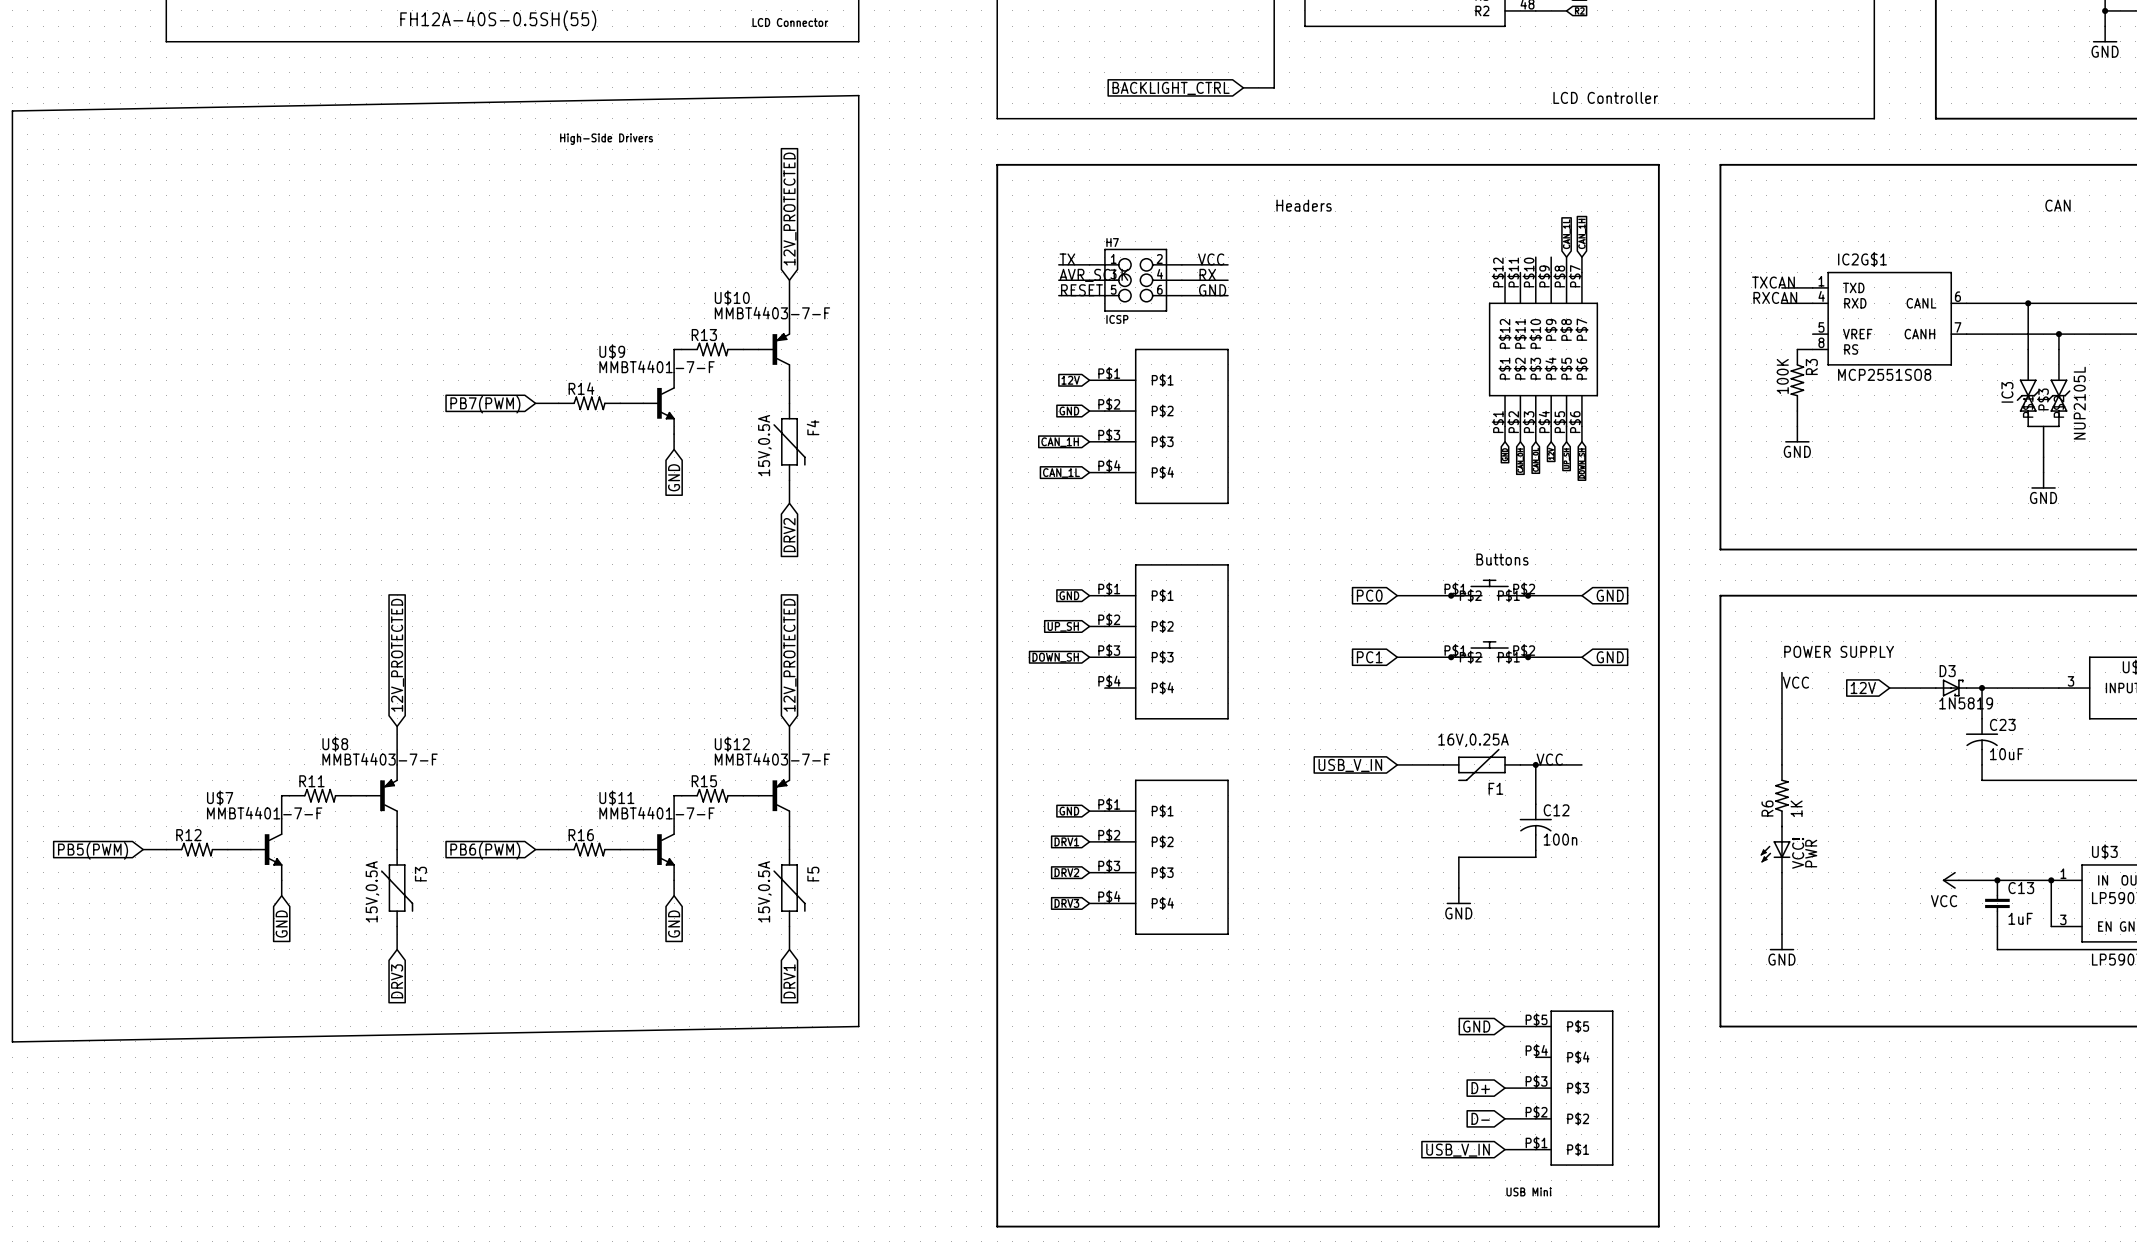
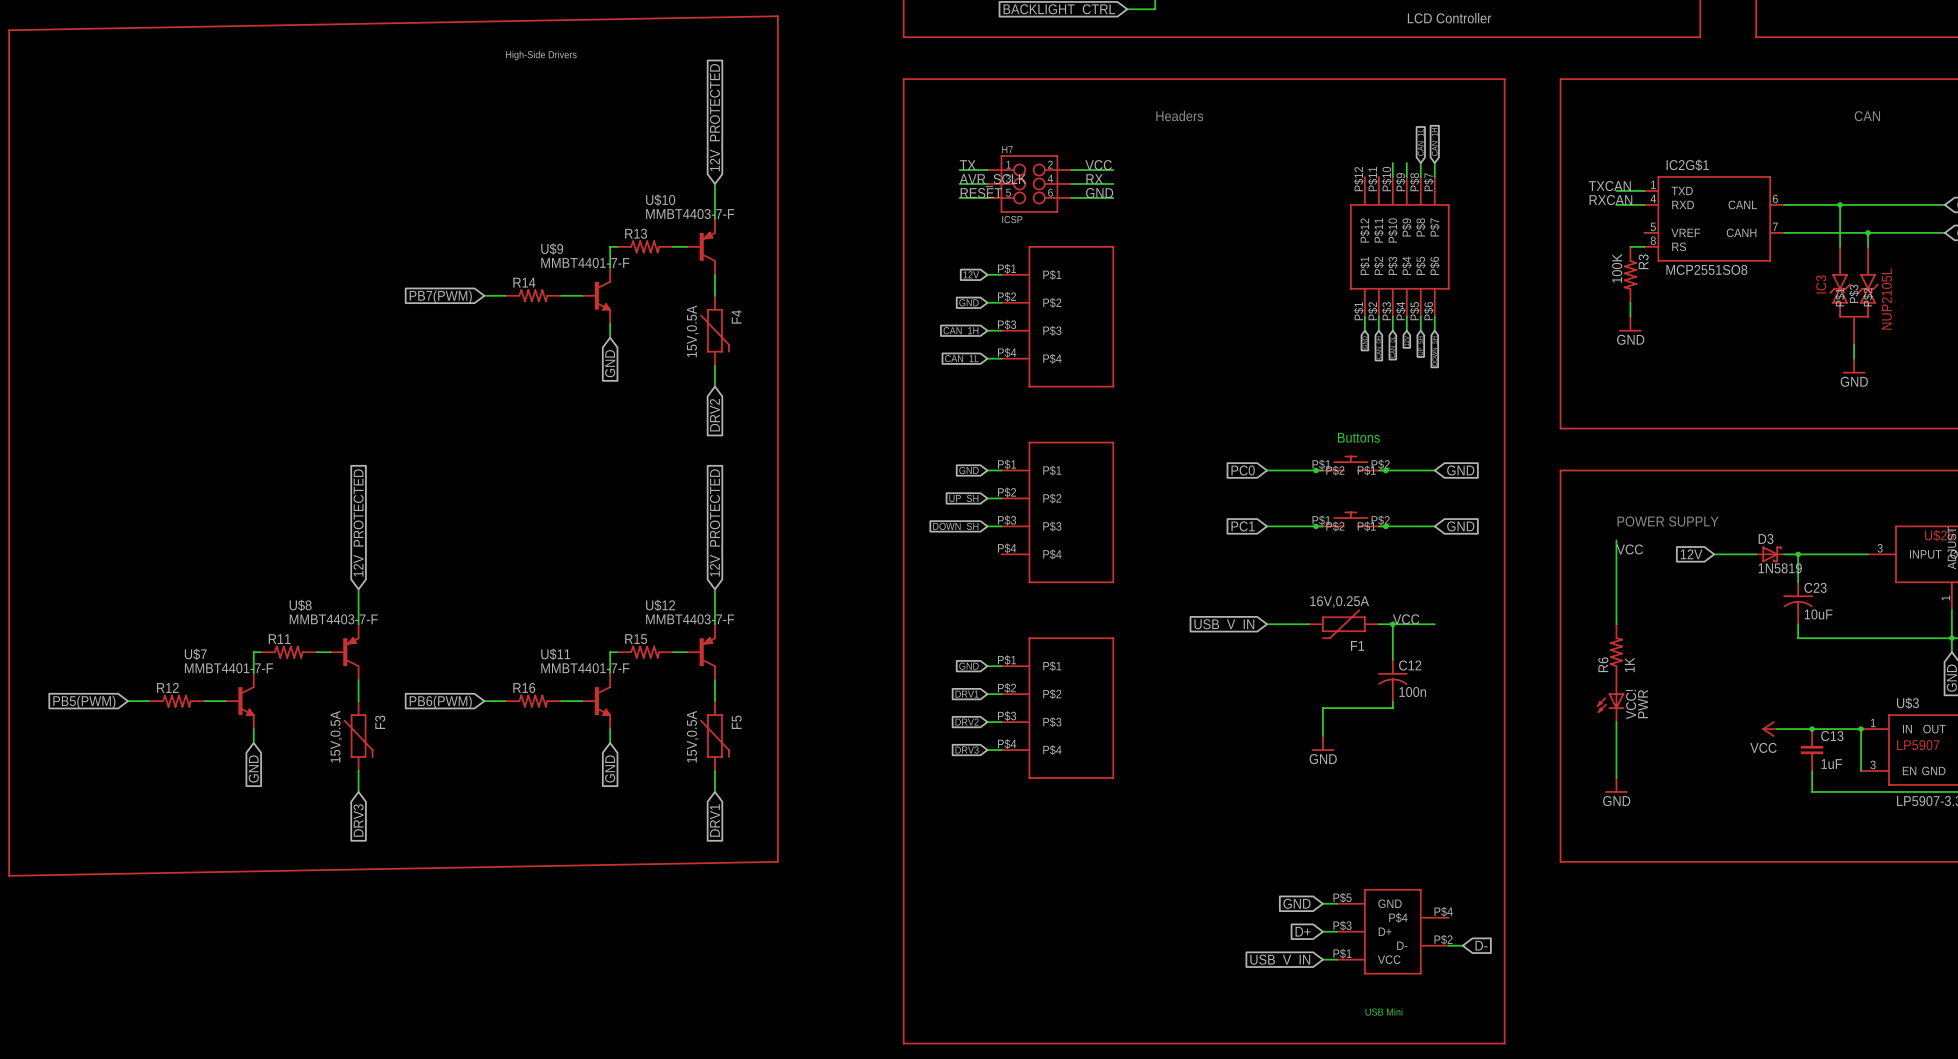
global label position: GND (1476, 1026) -> GND (1297, 903)
wire: (1505, 1026) (1535, 1026) -> none
wire: none -> (1322, 903) (1336, 903)
global label position: D+ (1480, 1088) -> D+ (1303, 931)
wire: (1505, 1088) (1535, 1088) -> none
part: (1574, 1088) -> none
wire: none -> (1322, 931) (1336, 931)
part: none -> (1392, 931)
global label rotation: 0° (1480, 1118) -> 180° (1481, 945)
global label position: D- (1480, 1118) -> D- (1481, 945)
wire: (1505, 1118) (1535, 1118) -> none
wire: none -> (1448, 945) (1462, 945)
wire: none -> (1322, 959) (1336, 959)
global label position: USB_V_IN (1458, 1150) -> USB_V_IN (1280, 961)

